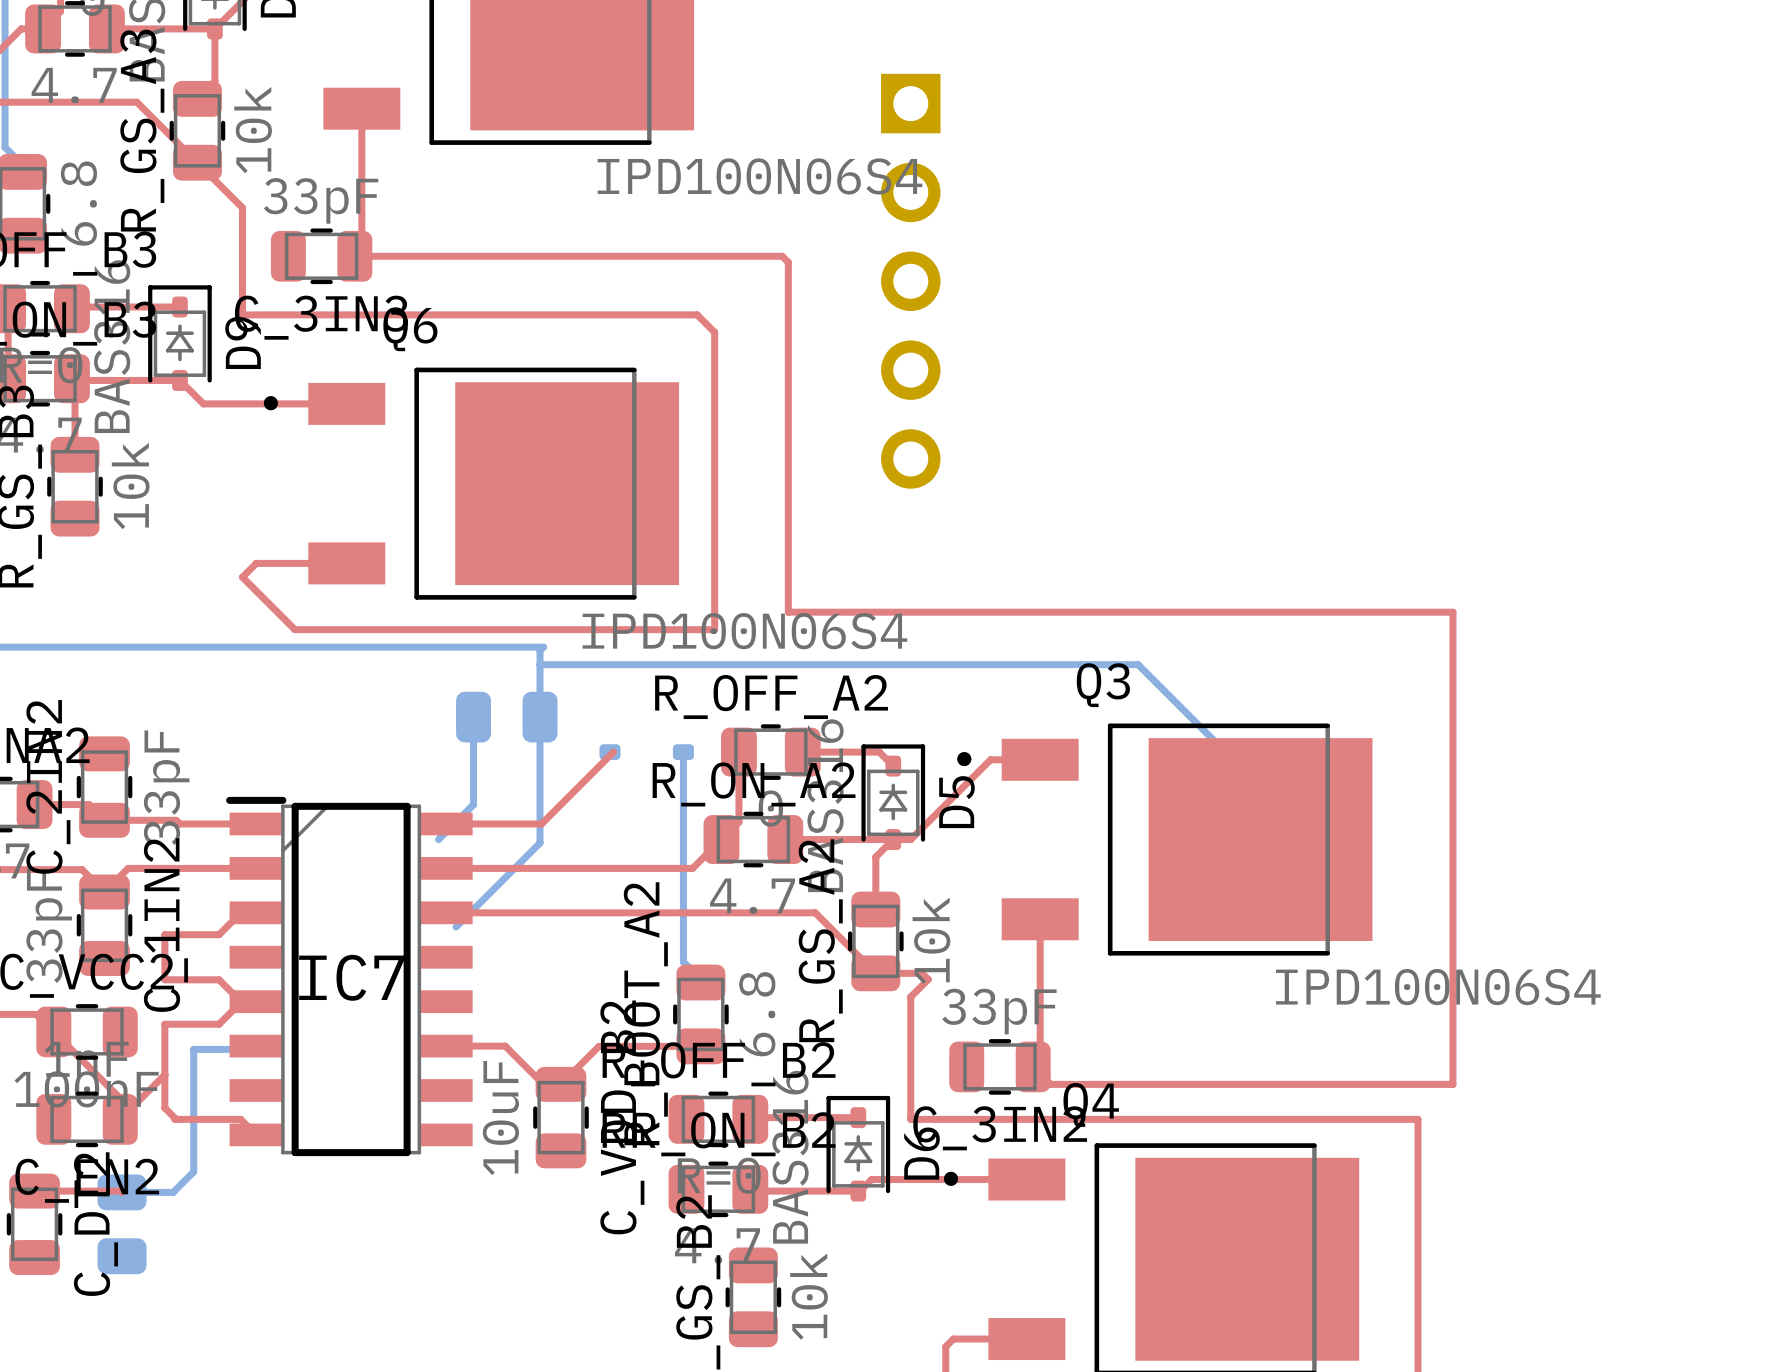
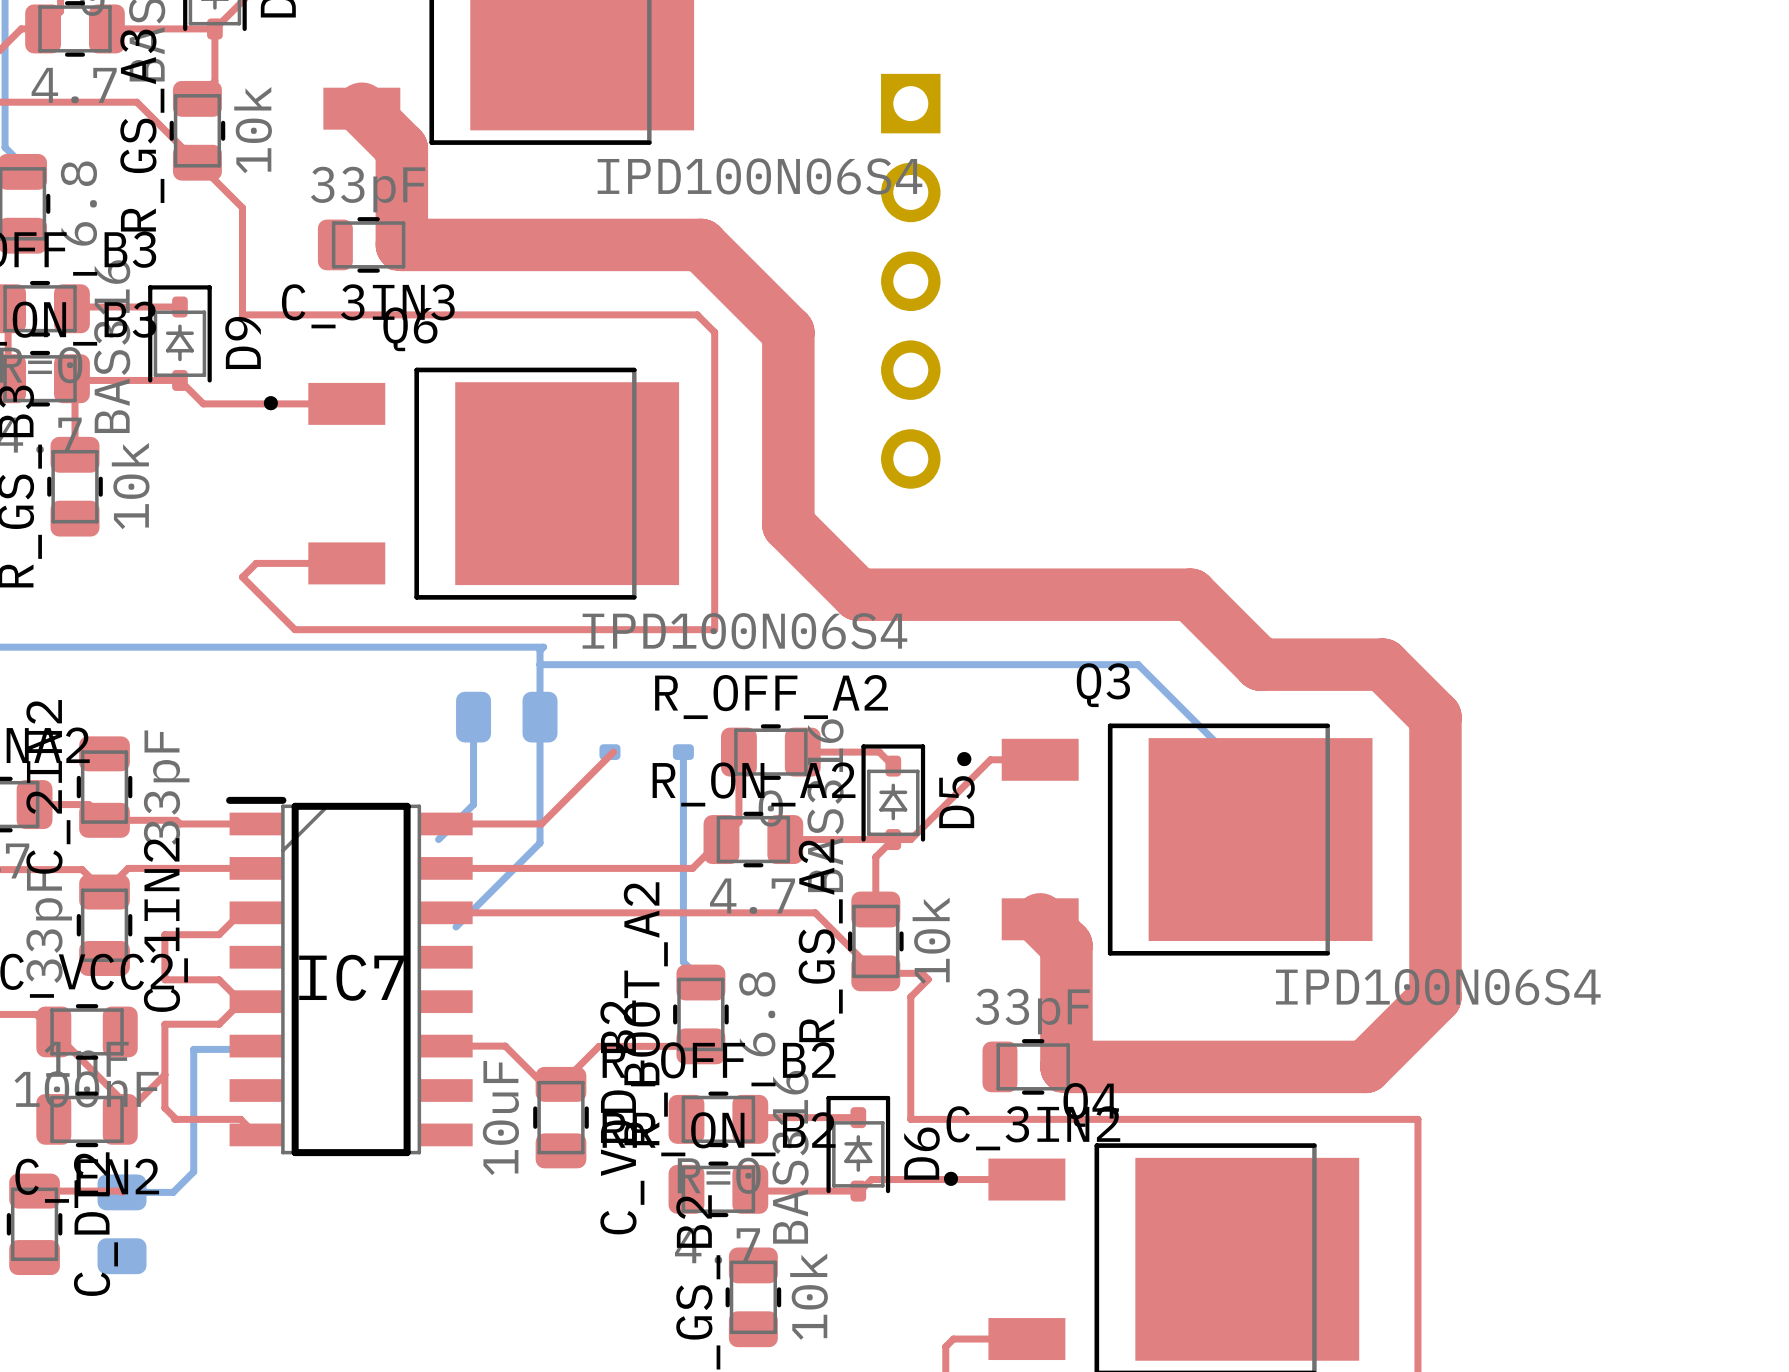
top track: (361, 108) (361, 249) (354, 256) (782, 256) (788, 262) (788, 332) -> (361, 108) (401, 148) (401, 244) (700, 244) (788, 332)
C_3IN3 position: (321, 256) -> (368, 244)
top track width: thin (788, 332) (788, 524) -> thick (788, 332) (788, 524)
top track: (788, 524) (788, 612) (1452, 612) (1452, 1084) (1050, 1084) (1033, 1066) (1040, 1059) (1040, 919) -> (788, 524) (858, 594) (1190, 594) (1260, 664) (1382, 664) (1435, 717) (1435, 996) (1365, 1066) (1066, 1066) (1066, 945) (1040, 919)
C_3IN2 position: (999, 1066) -> (1033, 1066)

